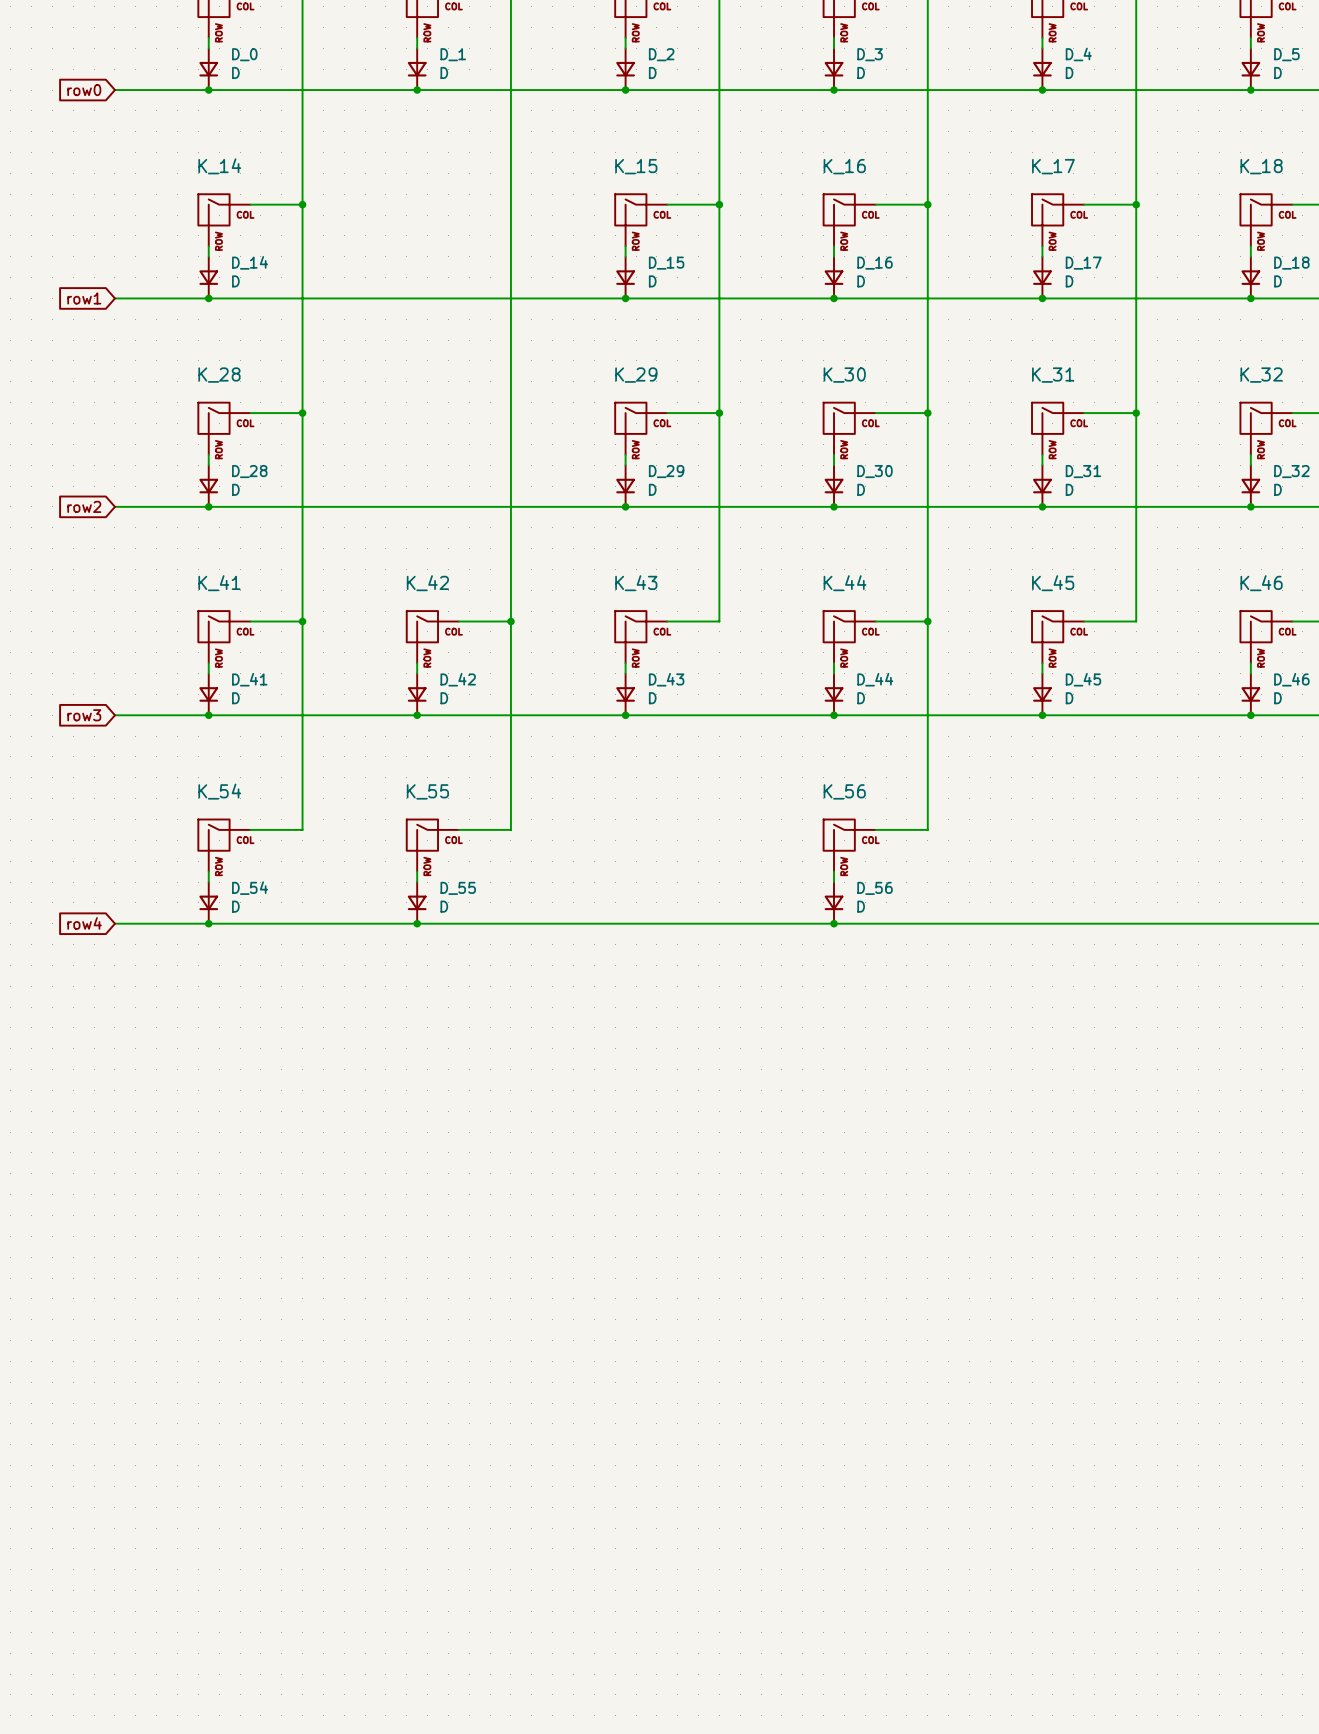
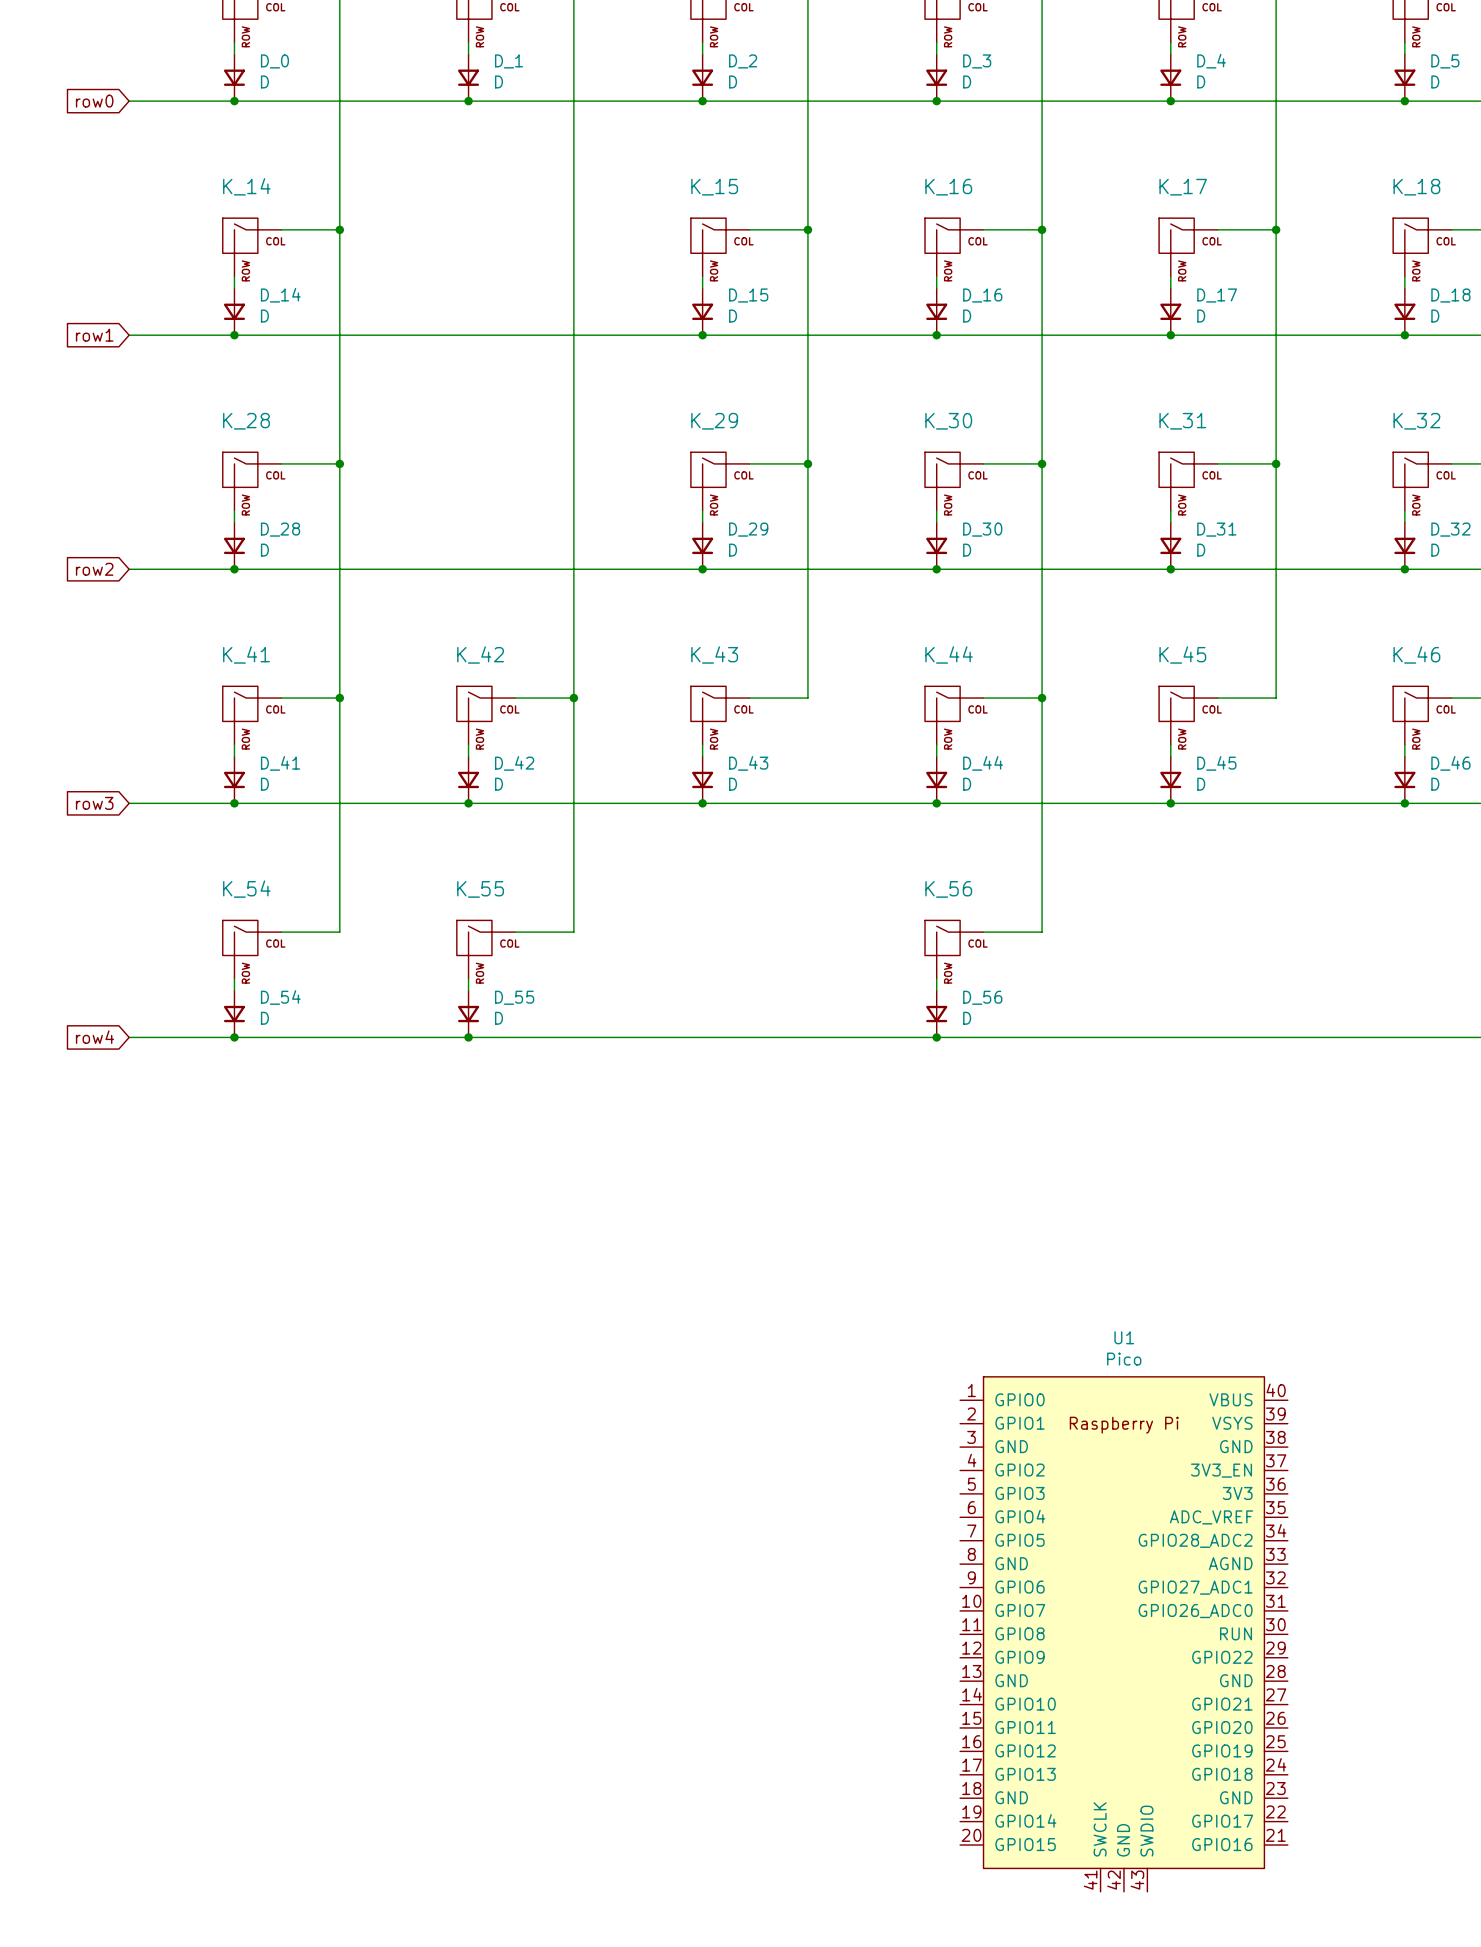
U1: none -> Pico (1123, 1634)

